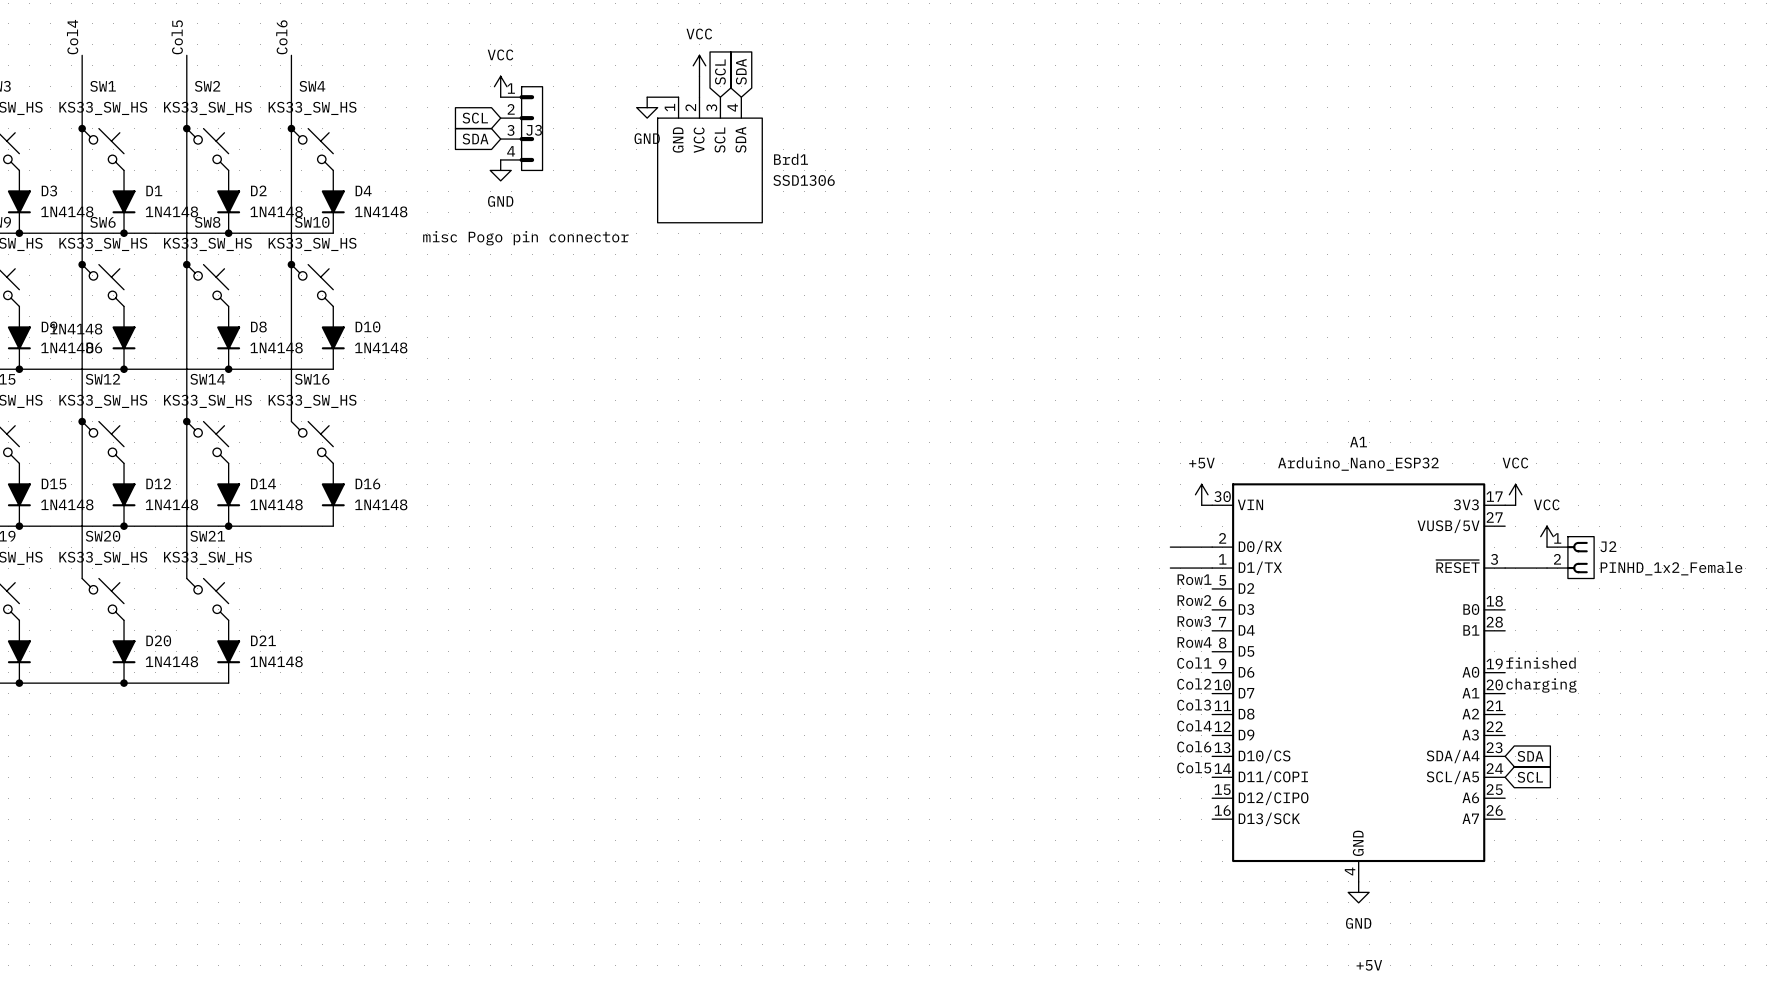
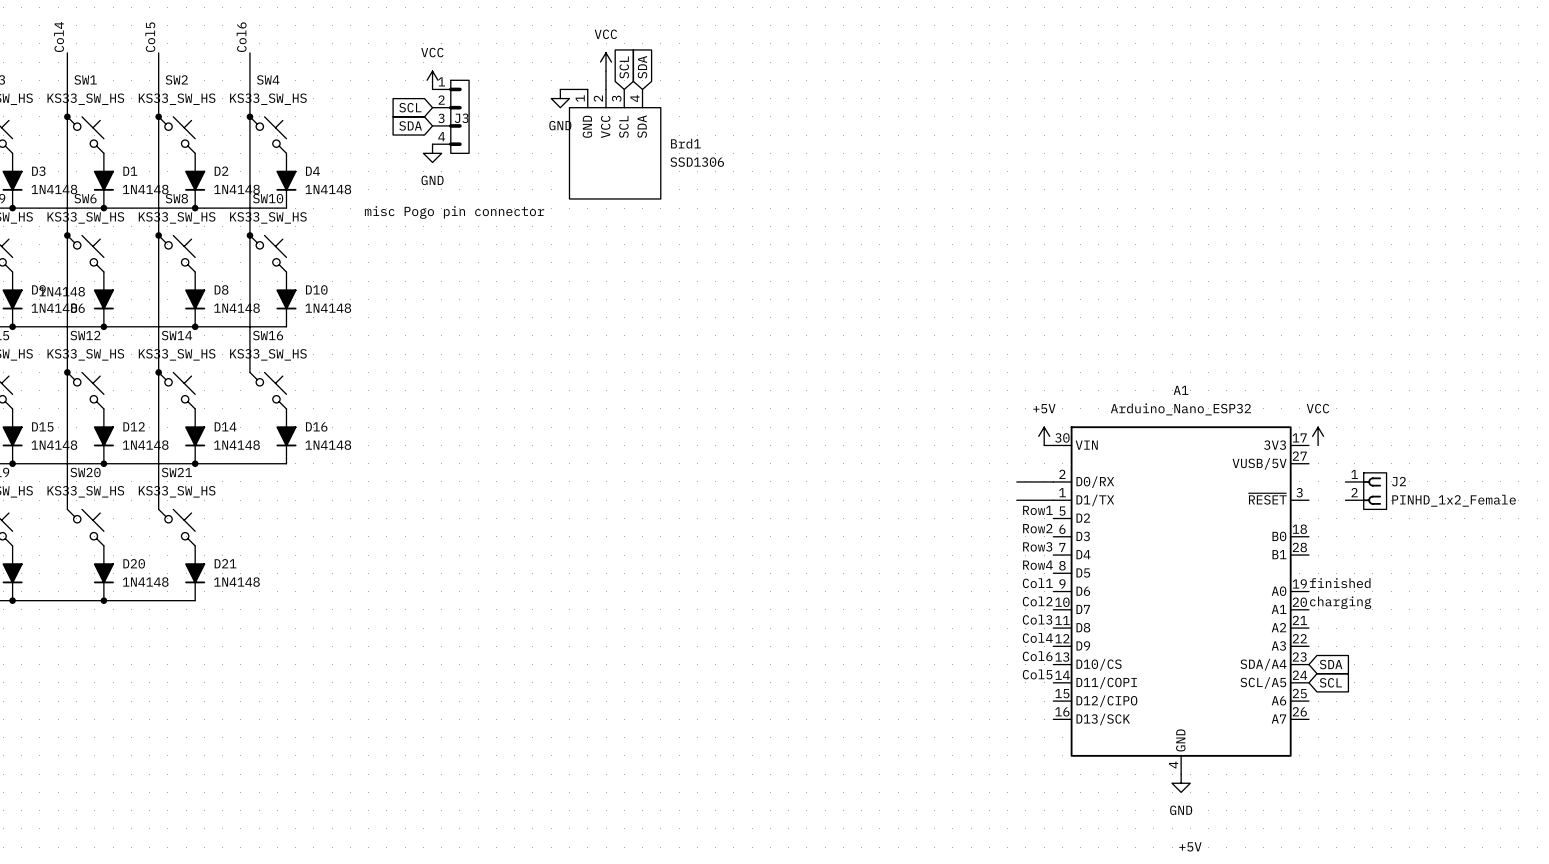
wire: (1505, 505) (1515, 505) -> none
power symbol: VCC (1547, 536) -> none
wire: (1505, 568) (1547, 568) -> none

